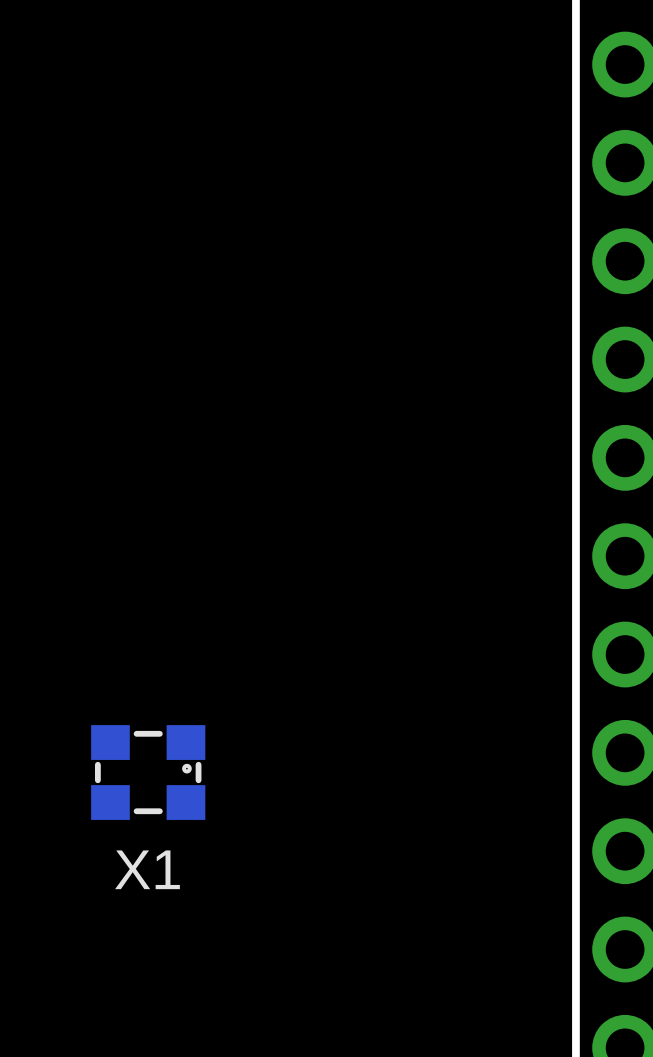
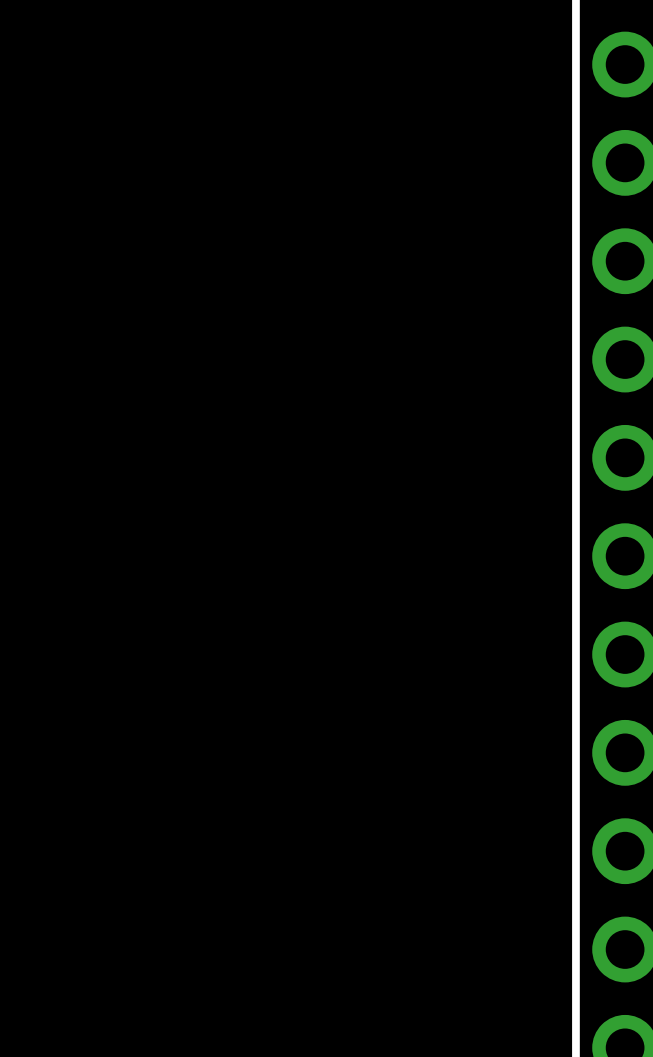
X1: (148, 772) -> none

